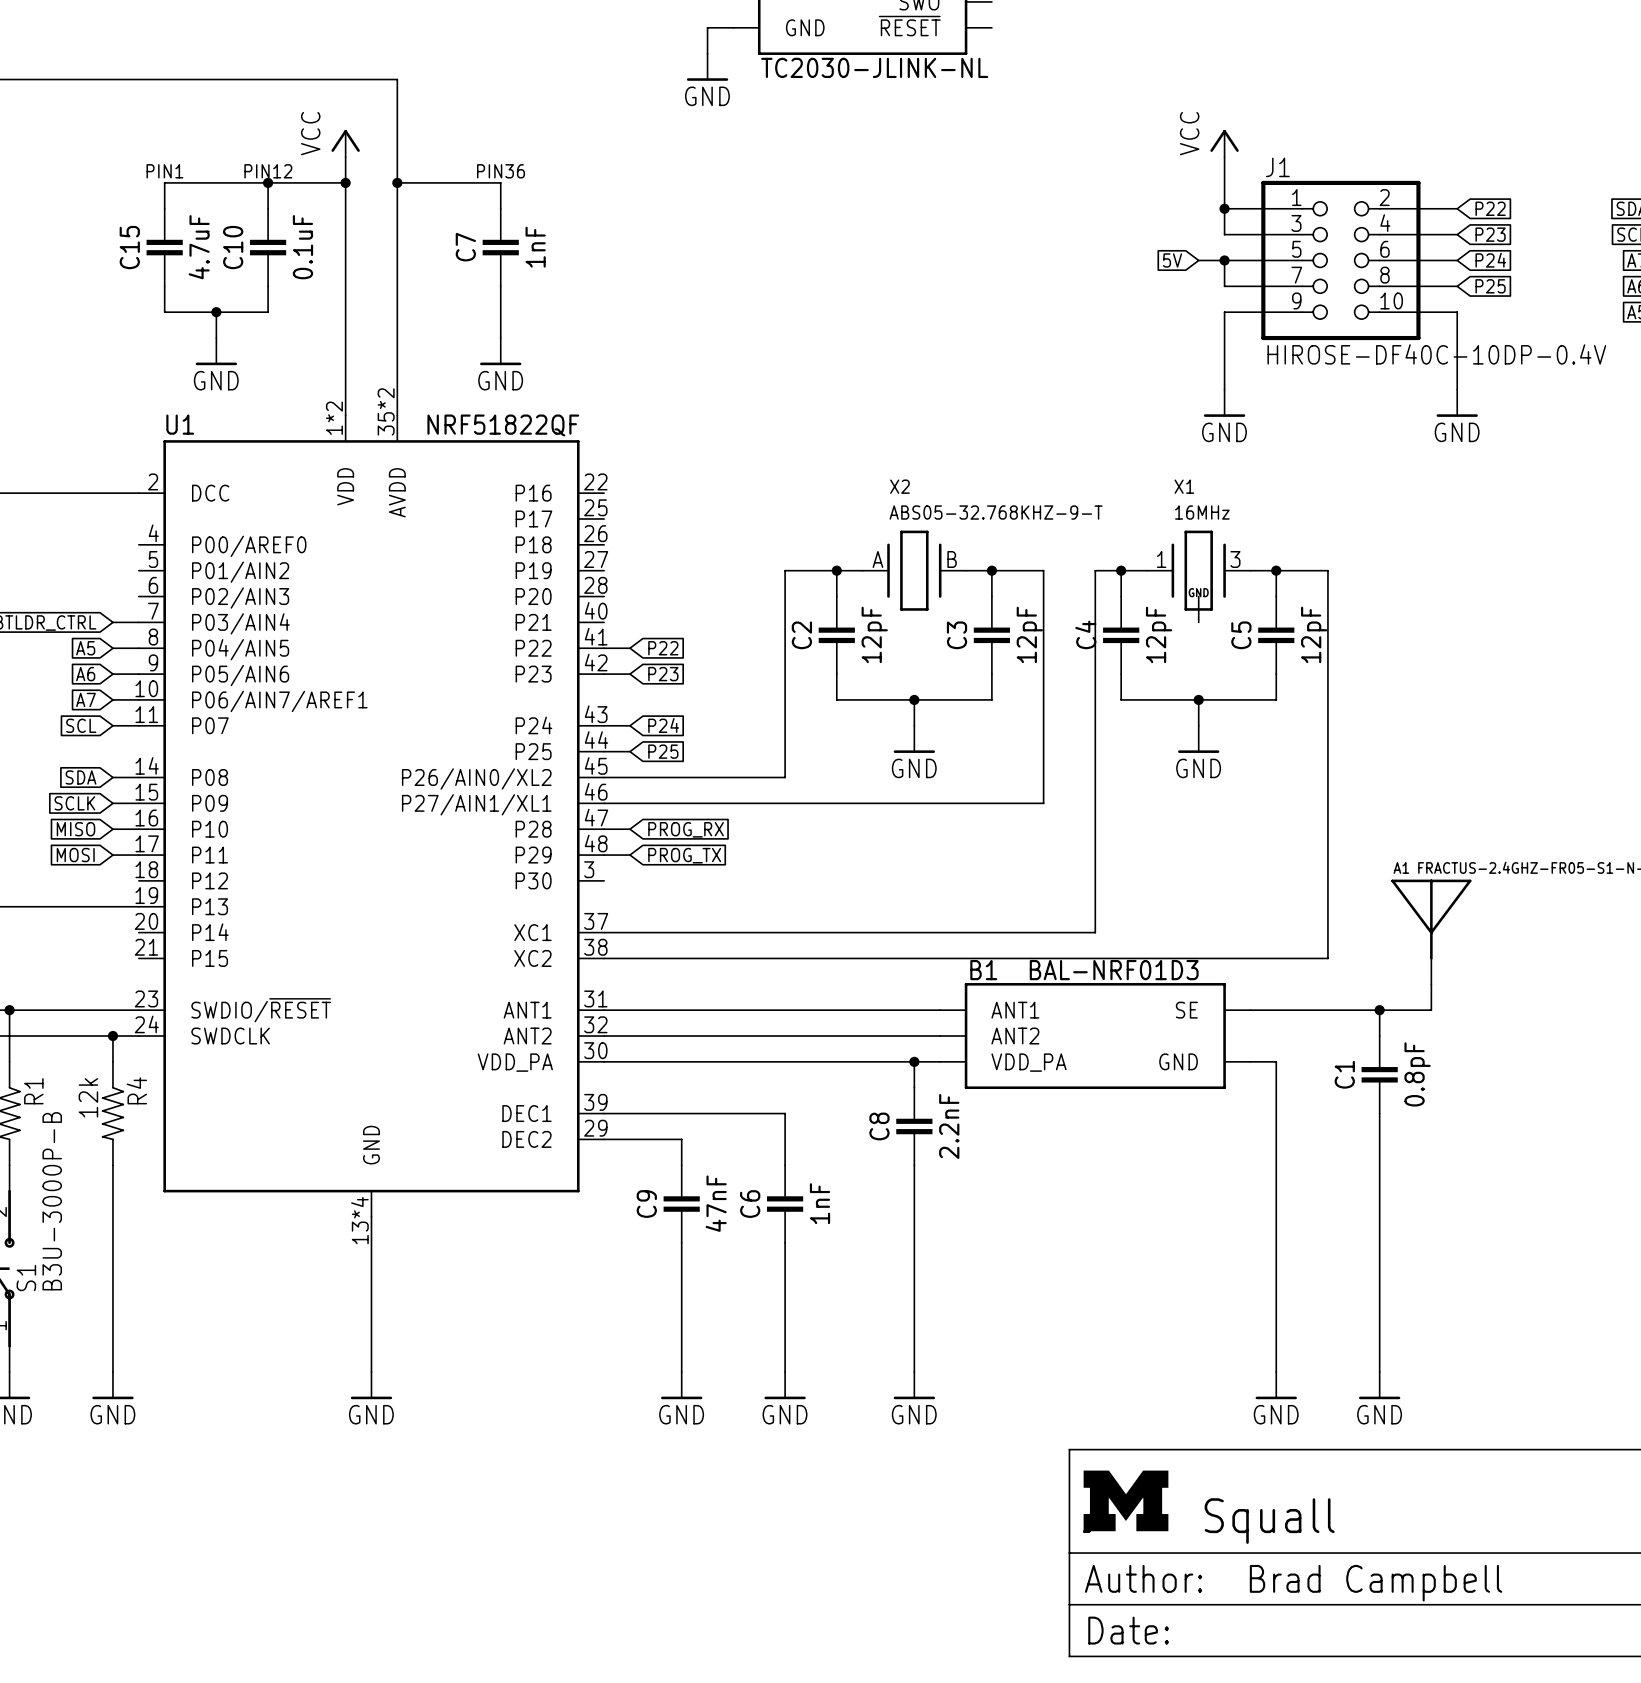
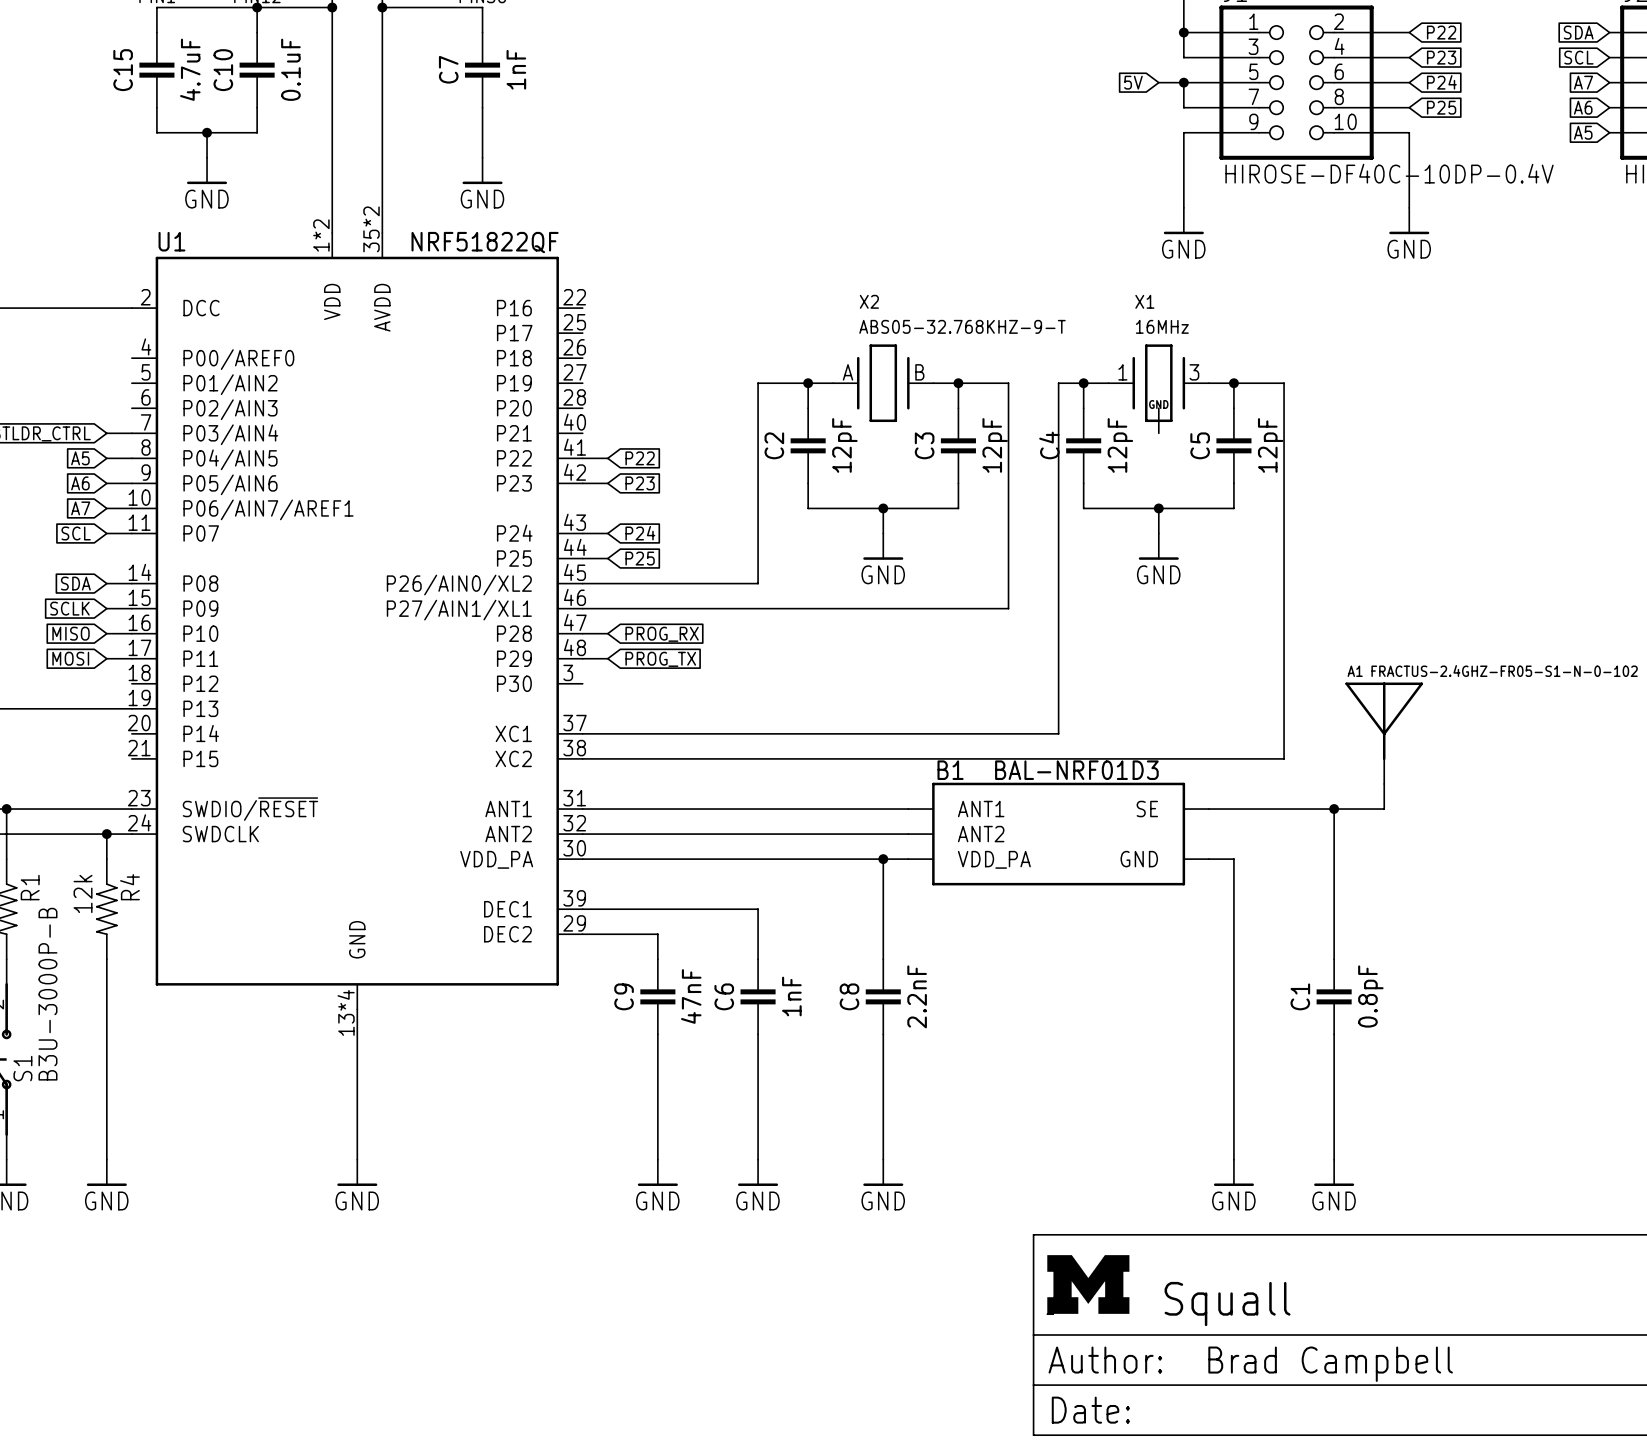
C1 position: (1379, 1074) -> (1334, 996)
C8 position: (914, 1126) -> (883, 996)

